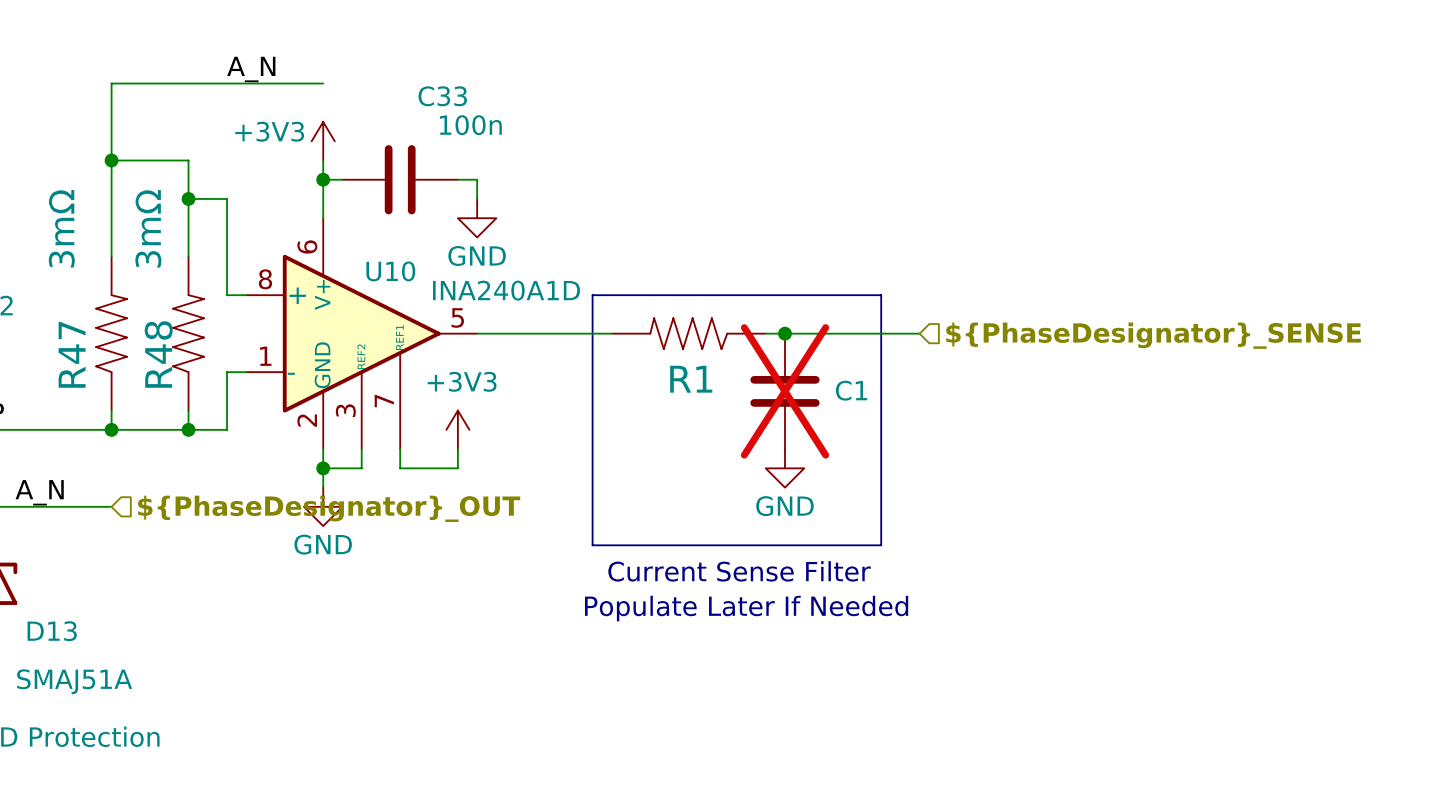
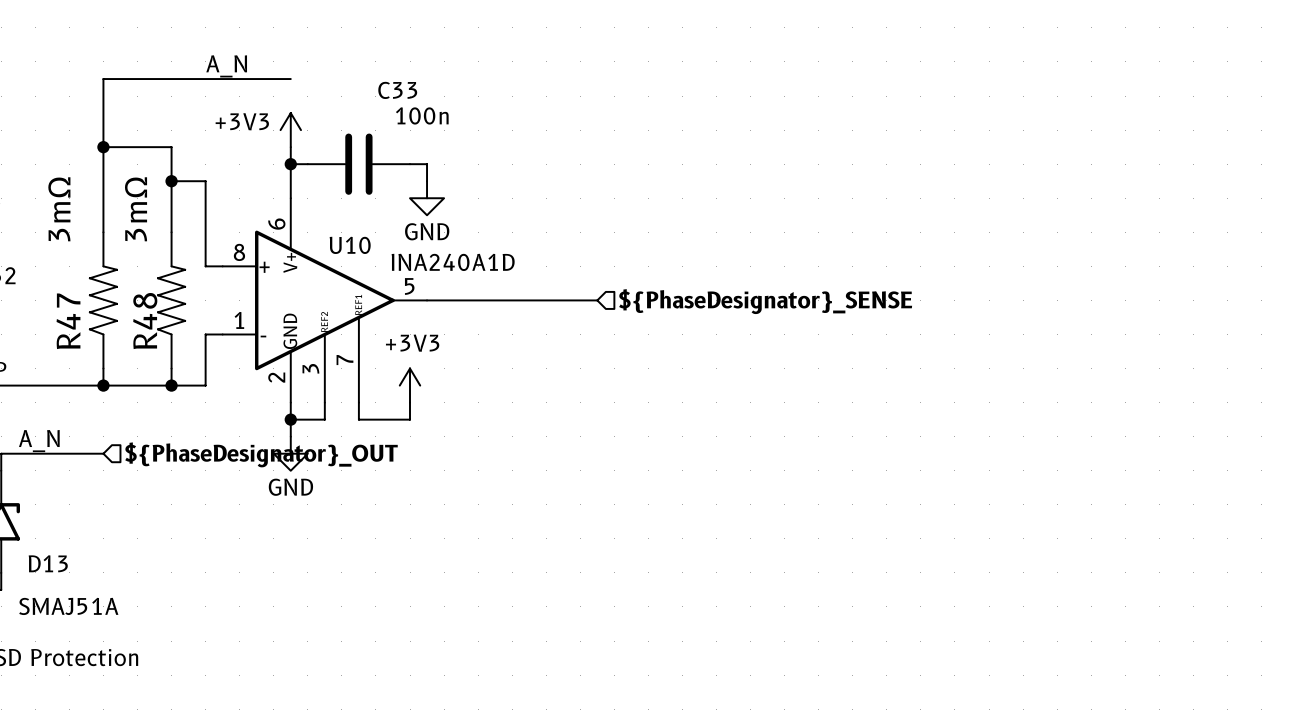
line: (592, 295) (881, 295) (881, 545) (592, 545) (592, 295) -> none
R1: (688, 333) -> none
junction: (784, 333) -> none
hierarchical label position: ${PhaseDesignator}_SENSE (1153, 335) -> ${PhaseDesignator}_SENSE (765, 301)
C1: (784, 391) -> none
power symbol: GND (784, 468) -> none
text: Current Sense Filter (739, 571) -> none
text: Populate Later If Needed (746, 608) -> none

